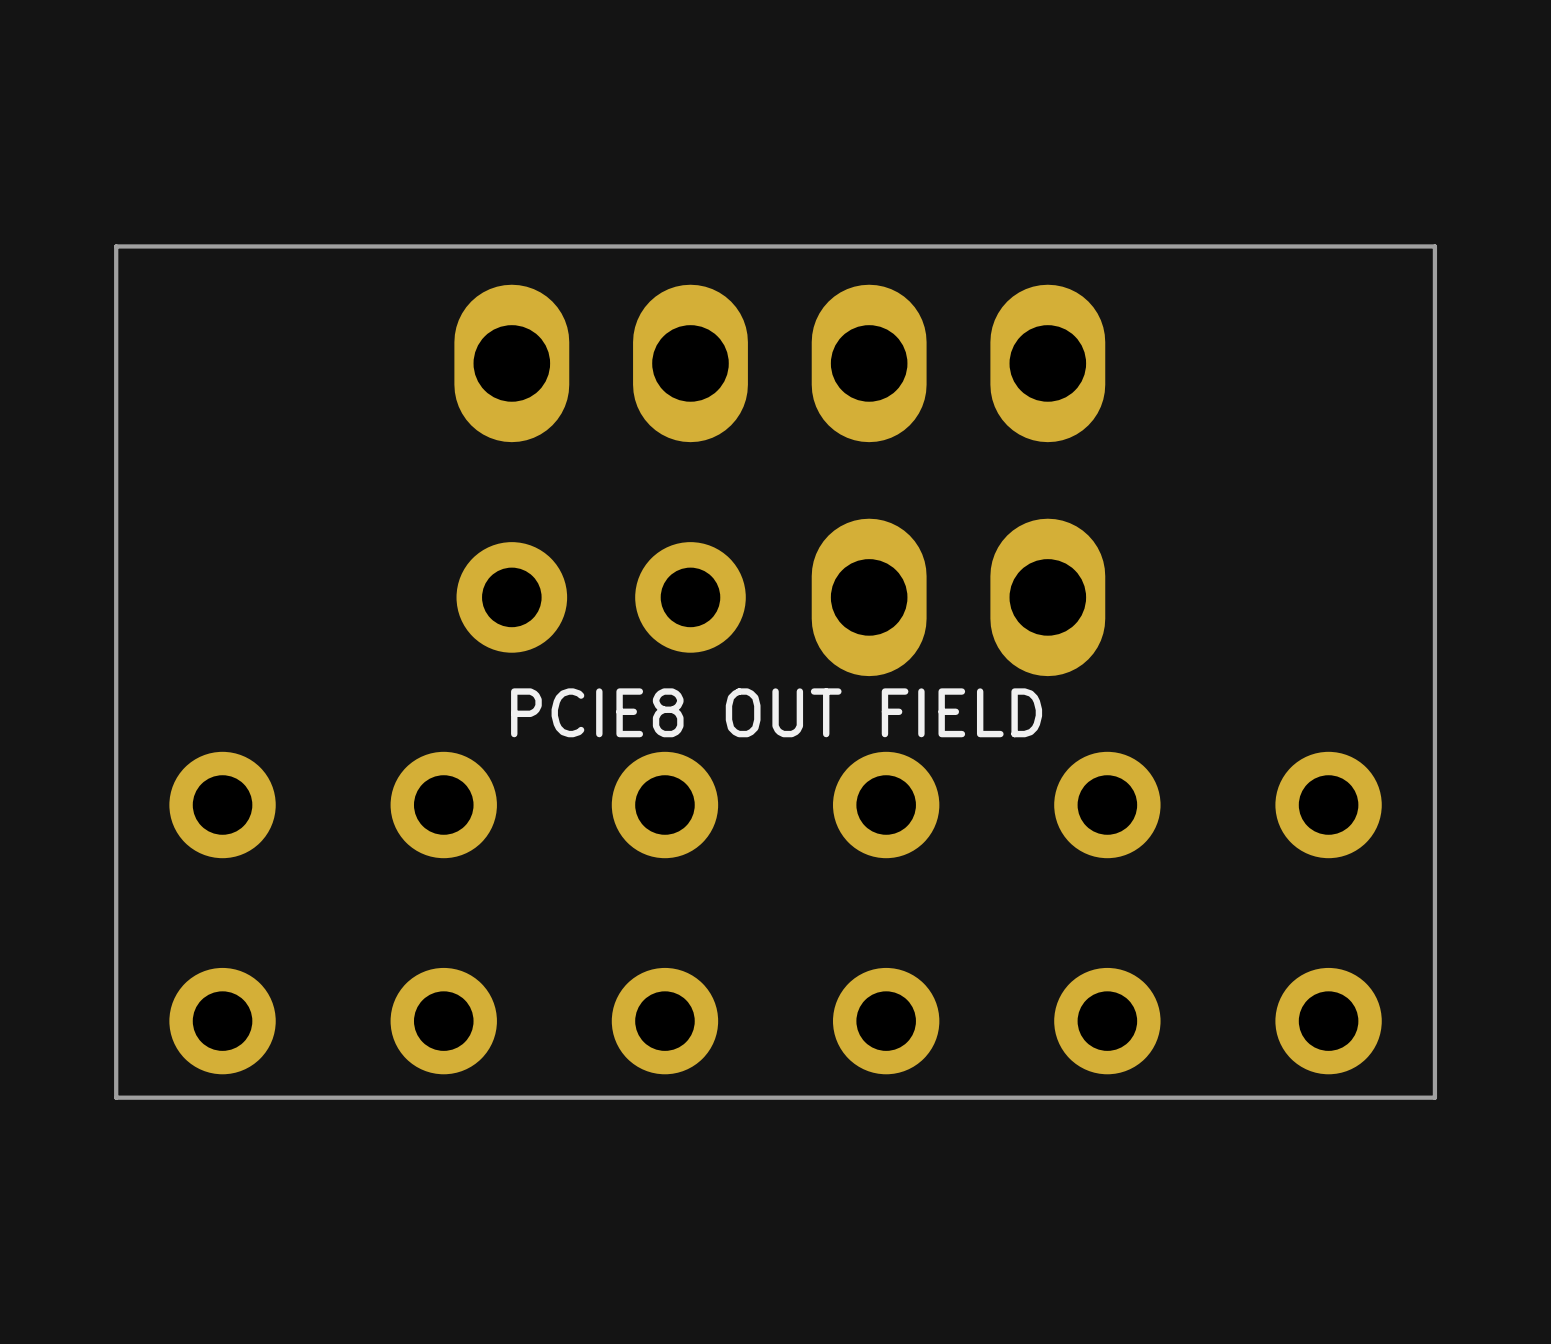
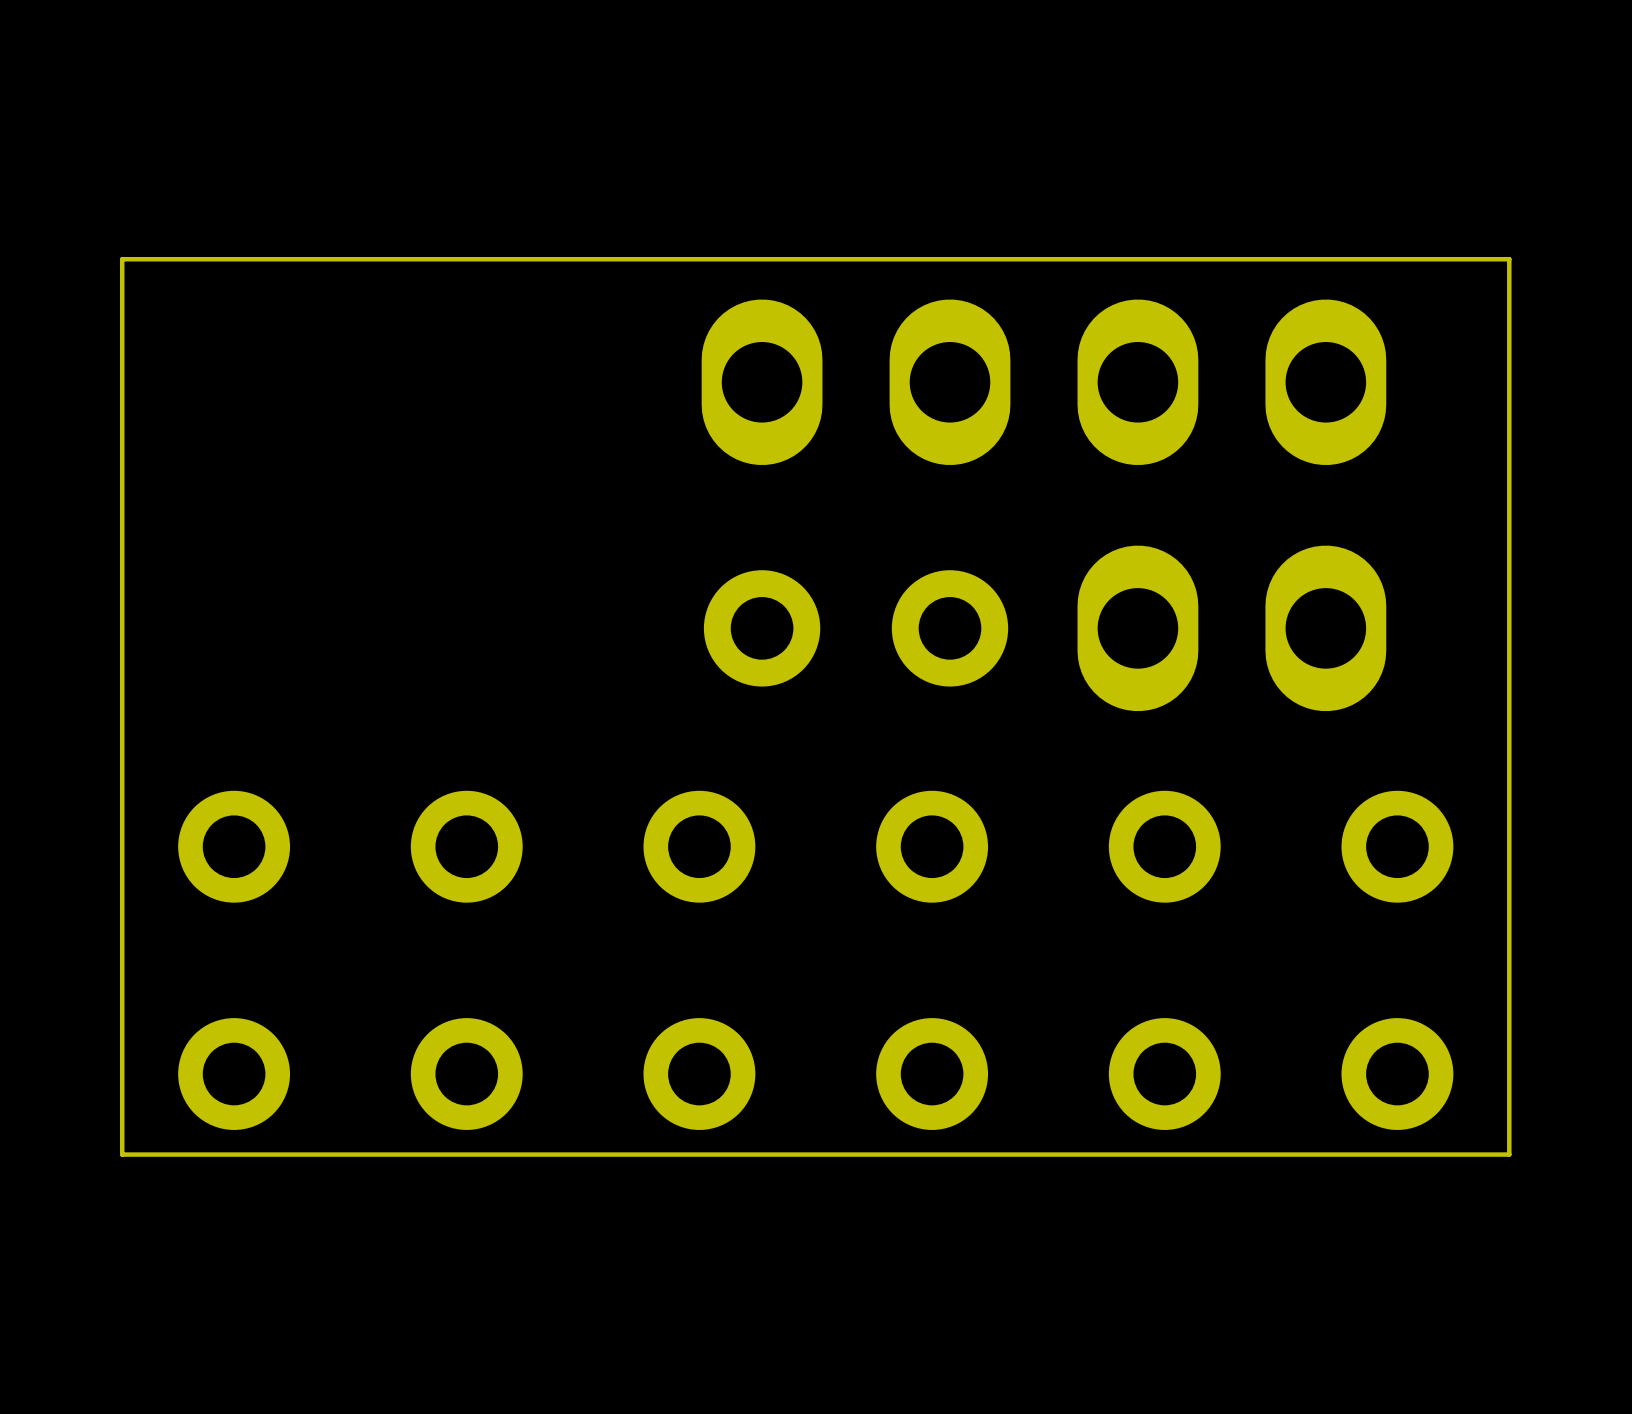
part: PCIE8 OUT FIELD (779, 480) -> none
part: none -> (1043, 505)

